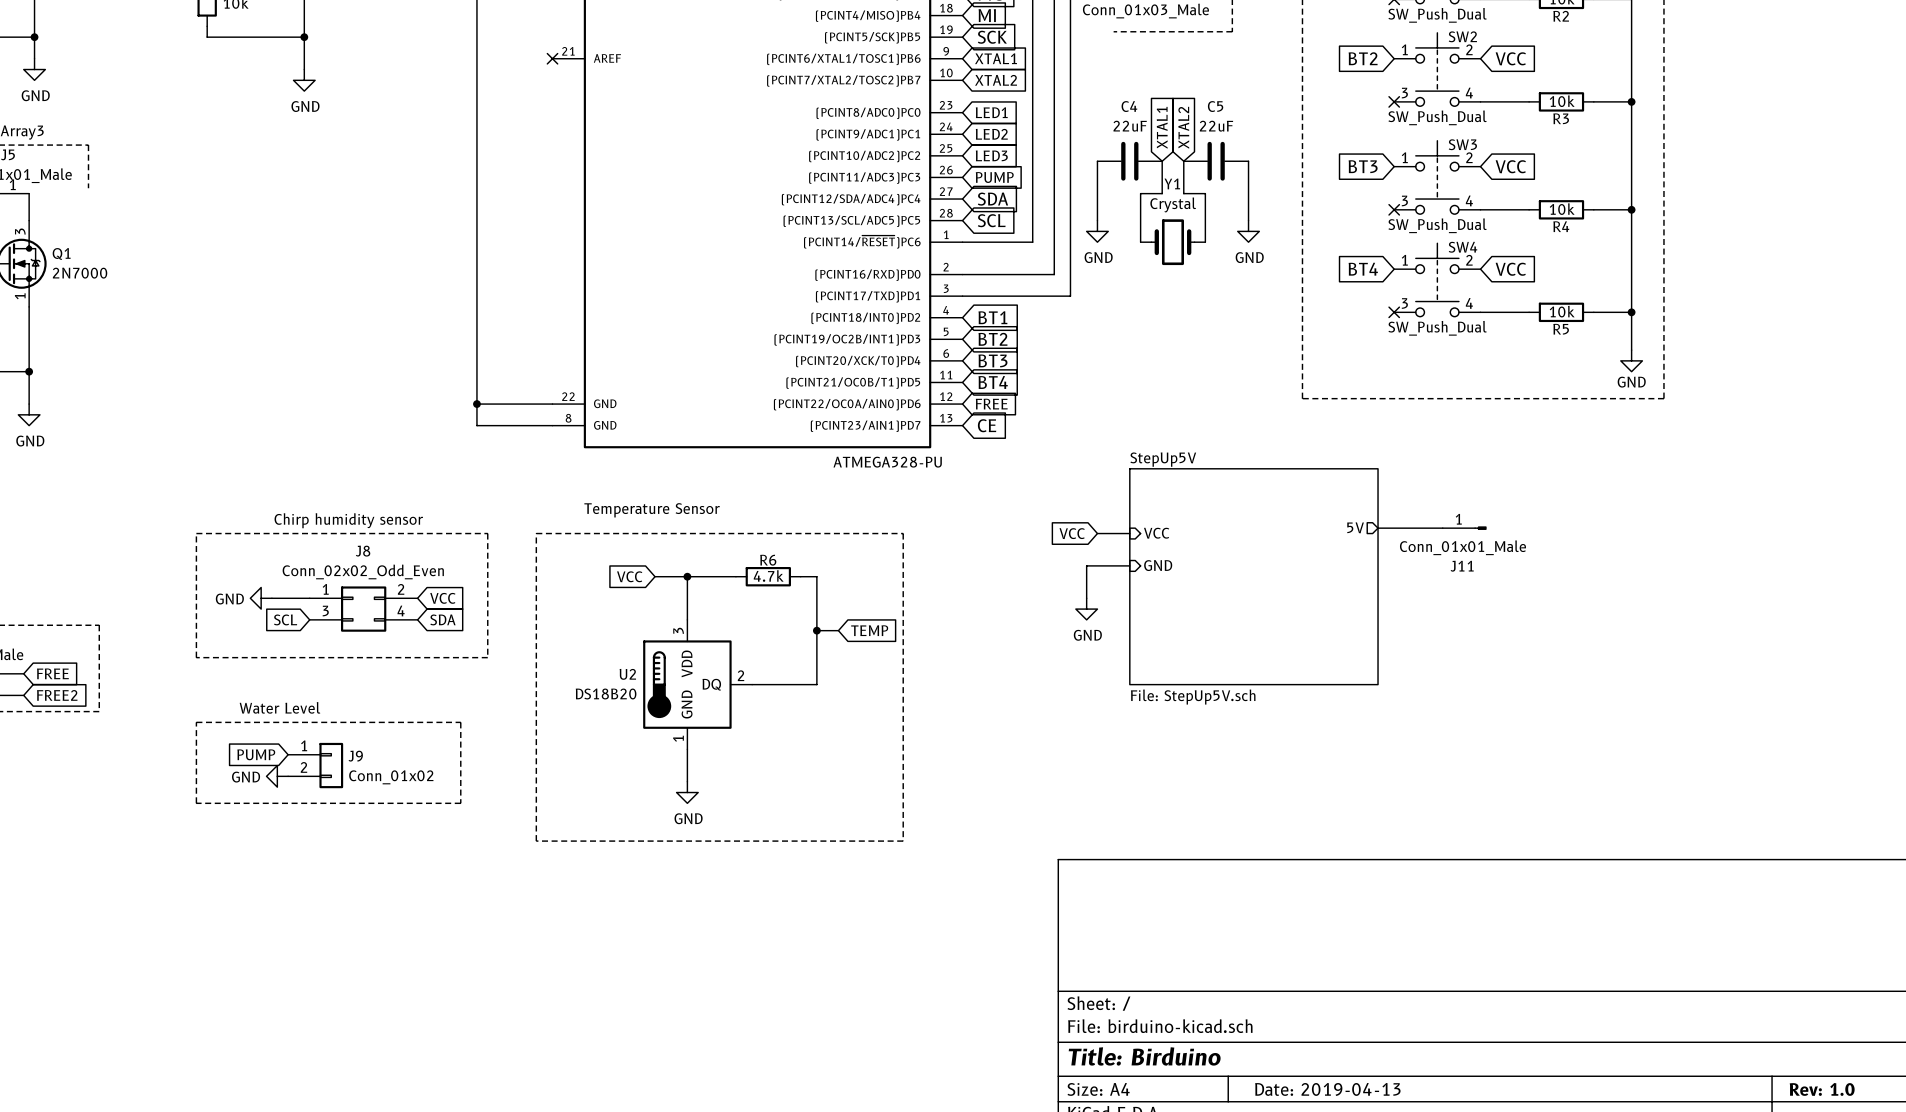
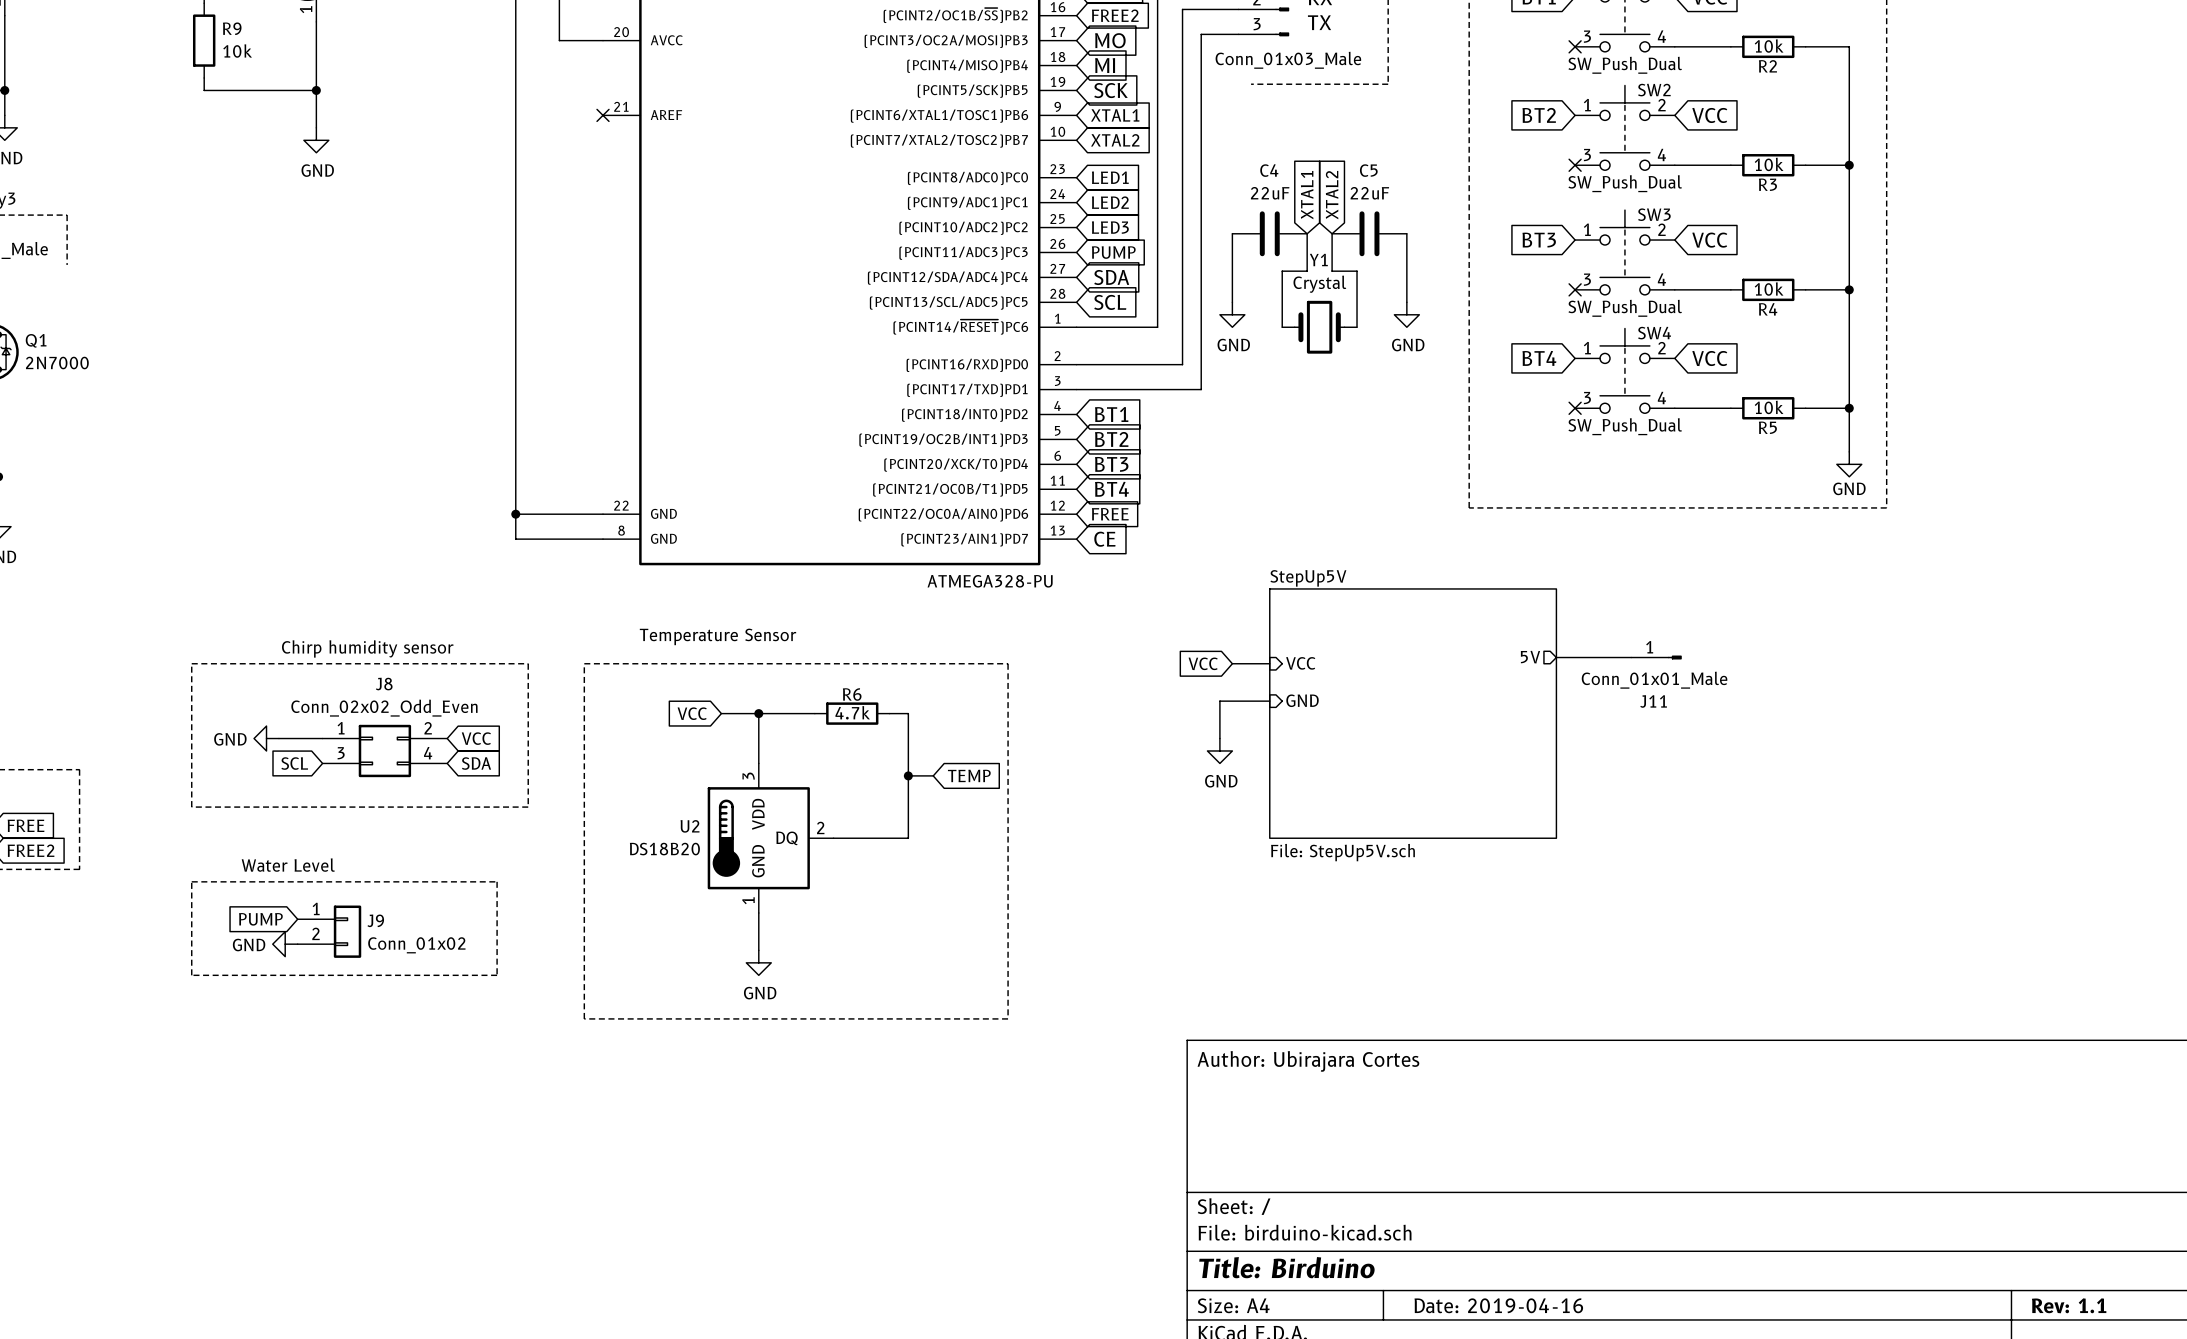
title block: none -> Author: Ubirajara Cortes (1308, 1061)
title block: Date: 2019-04-13 (1327, 1089) -> Date: 2019-04-16 (1498, 1305)
title block: Rev: 1.0 (1822, 1089) -> Rev: 1.1 (2069, 1305)

